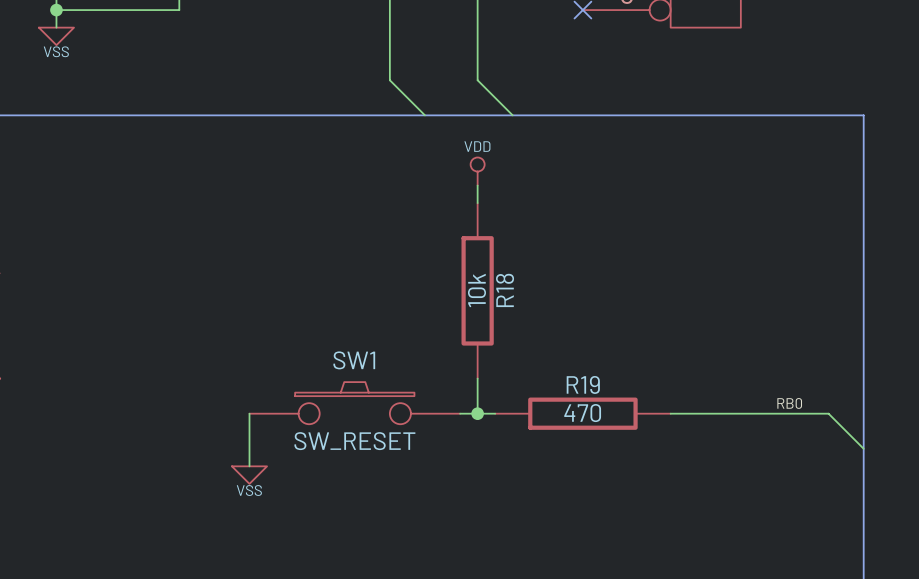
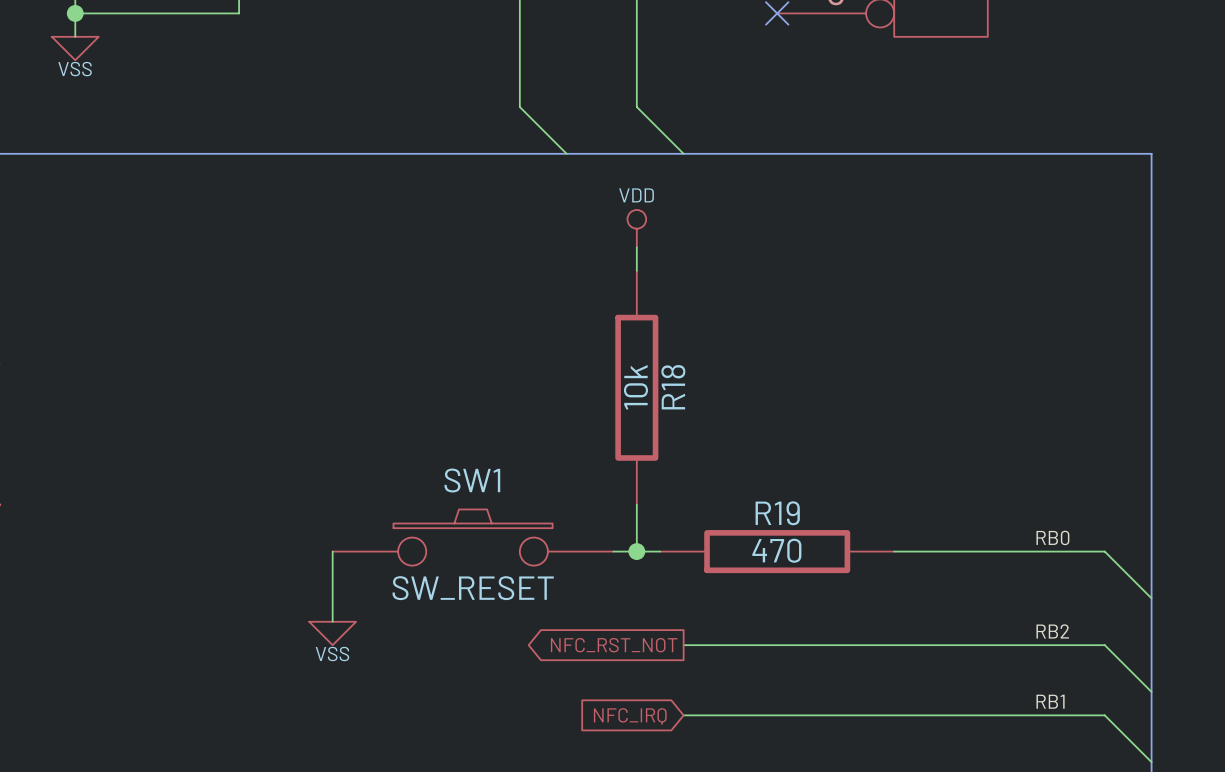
label: none -> RB2 (1052, 631)
global label: none -> NFC_RST_NOT (614, 645)
wire: none -> (683, 645) (1104, 645) (1151, 691)
label: none -> RB1 (1050, 701)
wire: none -> (683, 715) (1104, 715) (1151, 762)
global label: none -> NFC_IRQ (630, 716)

